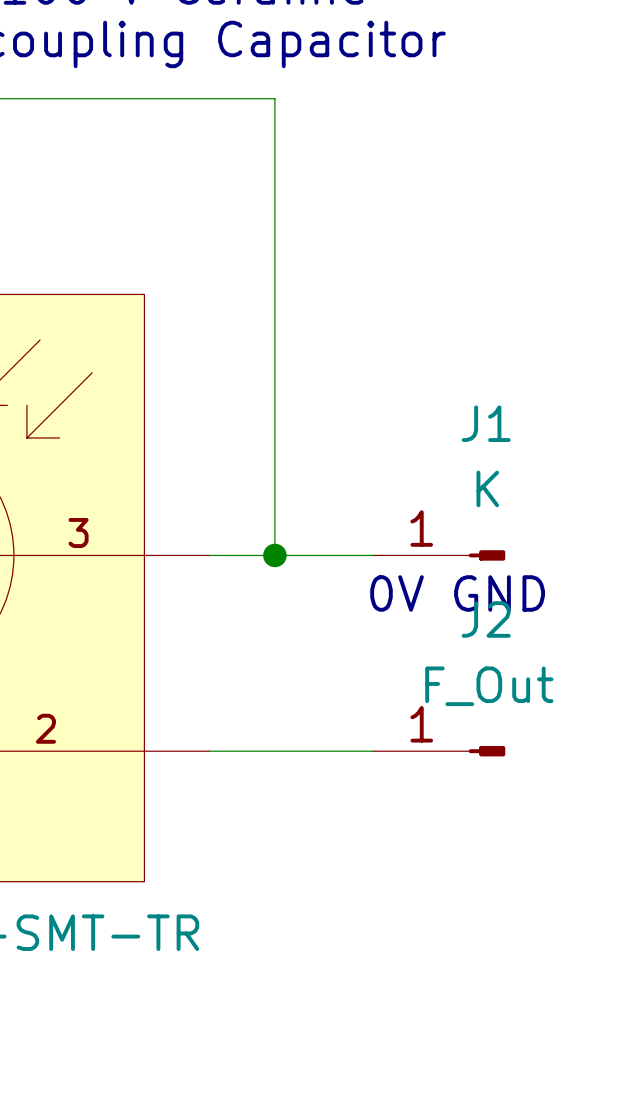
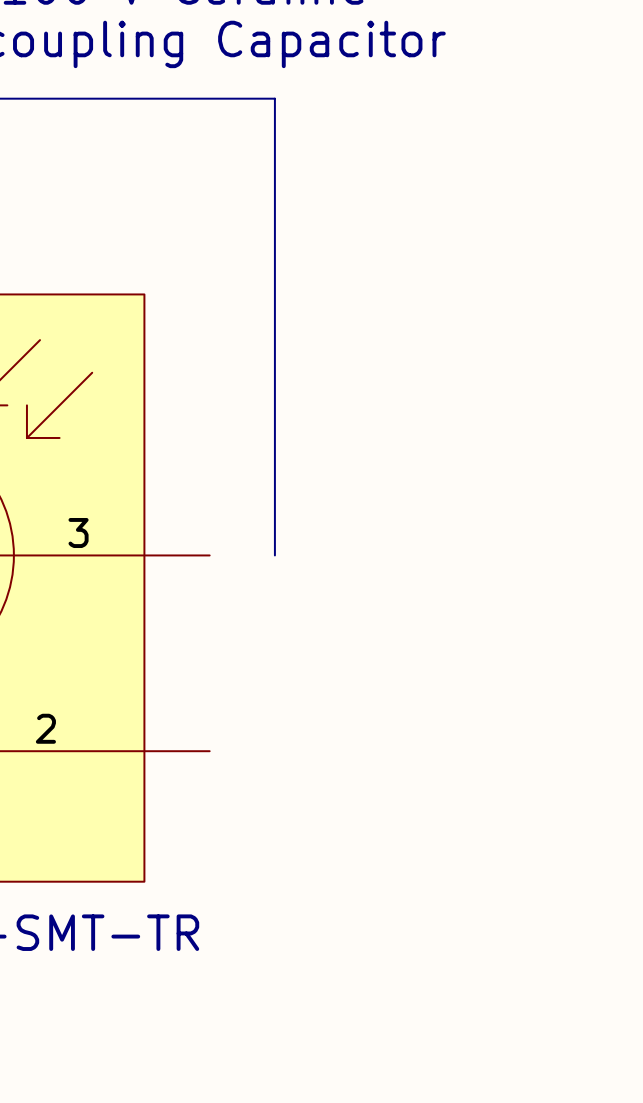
wire: (209, 555) (372, 555) -> none
junction: (274, 555) -> none
J1: K (439, 555) -> none
text: 0V GND (457, 593) -> none
wire: (209, 751) (372, 751) -> none
J2: F_Out (439, 751) -> none

